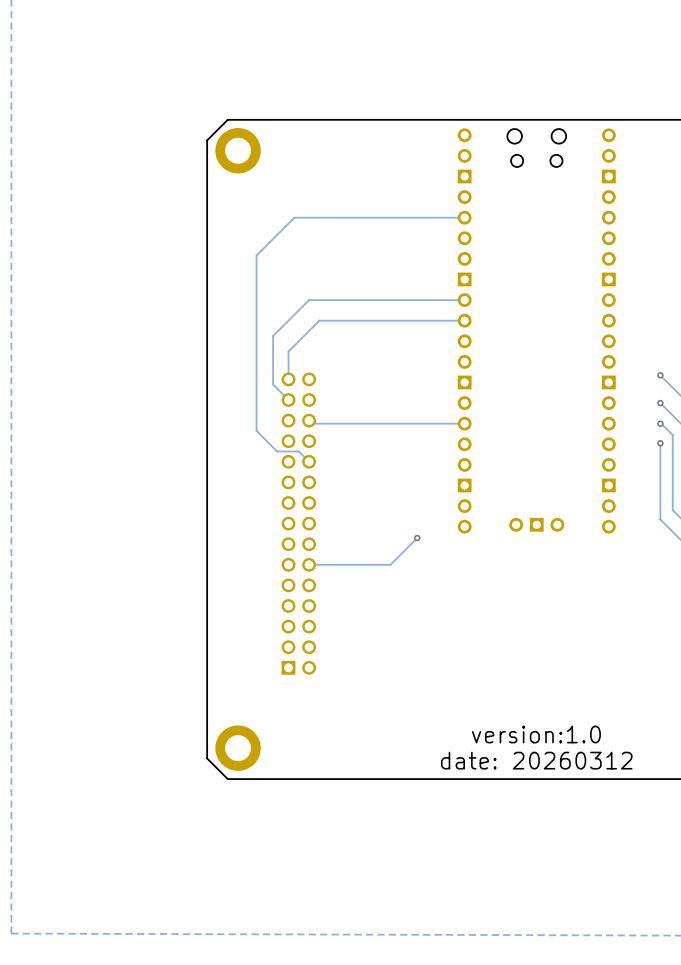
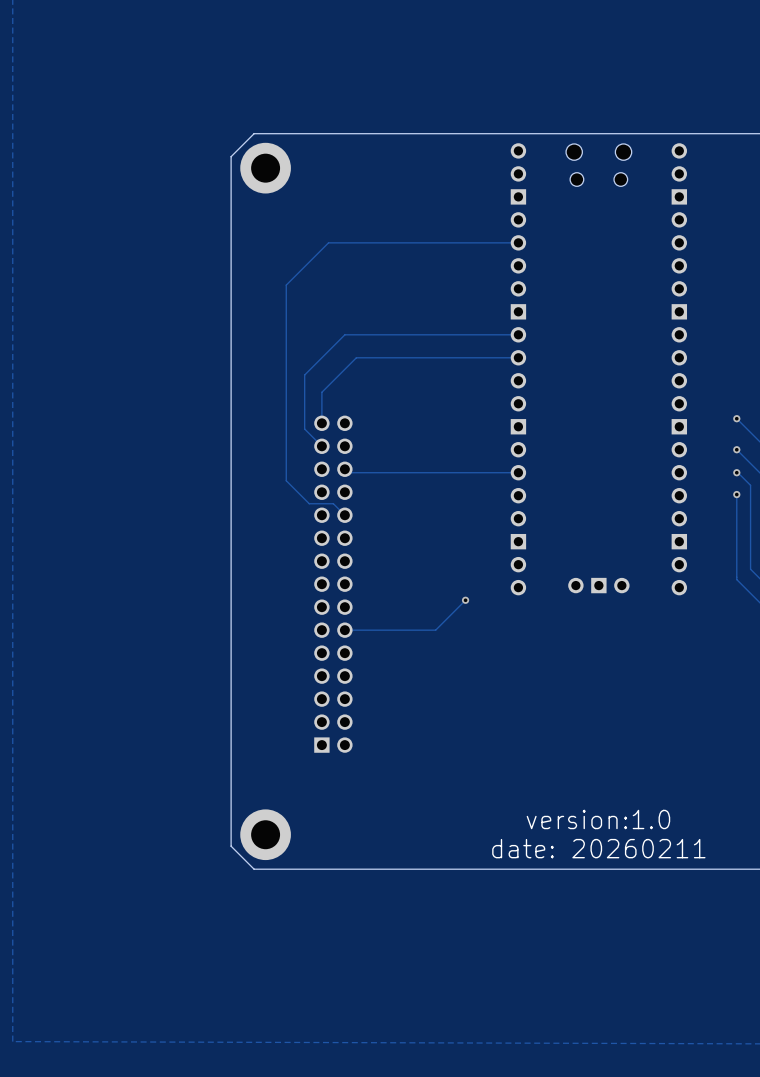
text: date: 20260312 (536, 760) -> date: 20260211 (598, 848)

